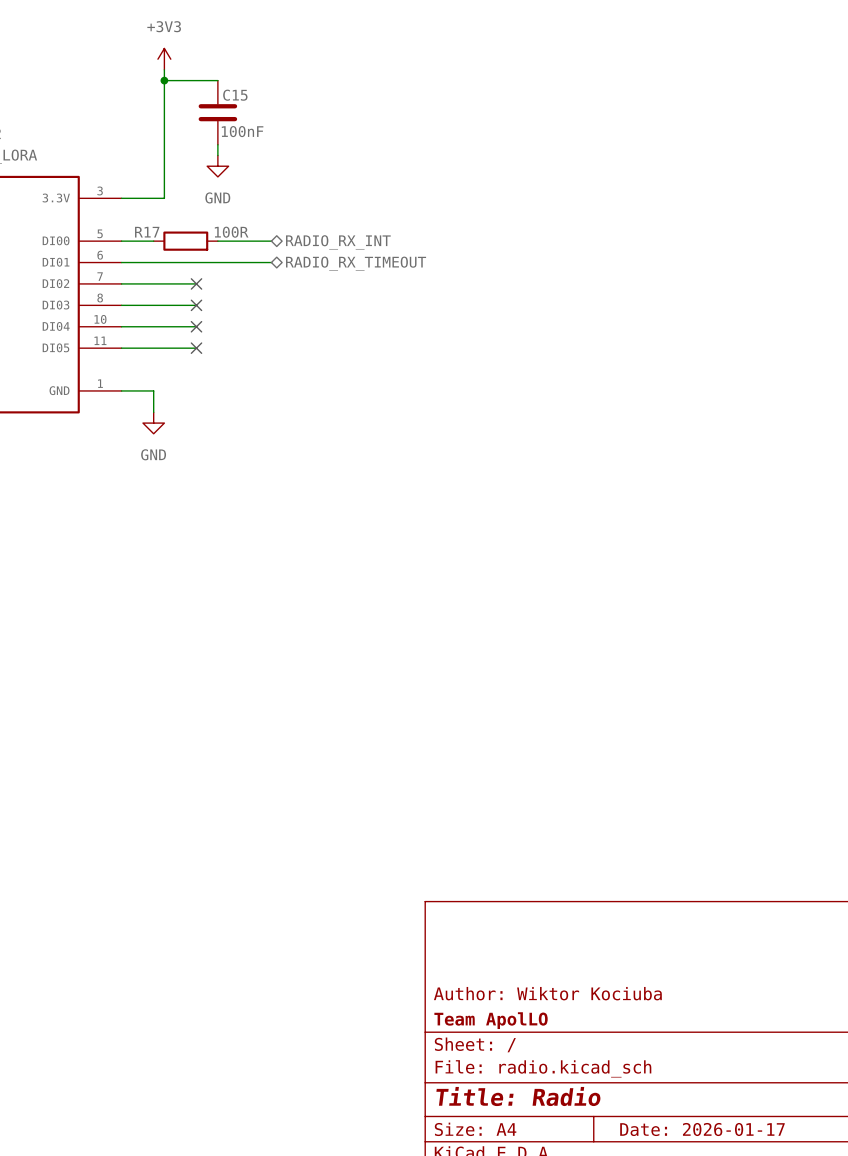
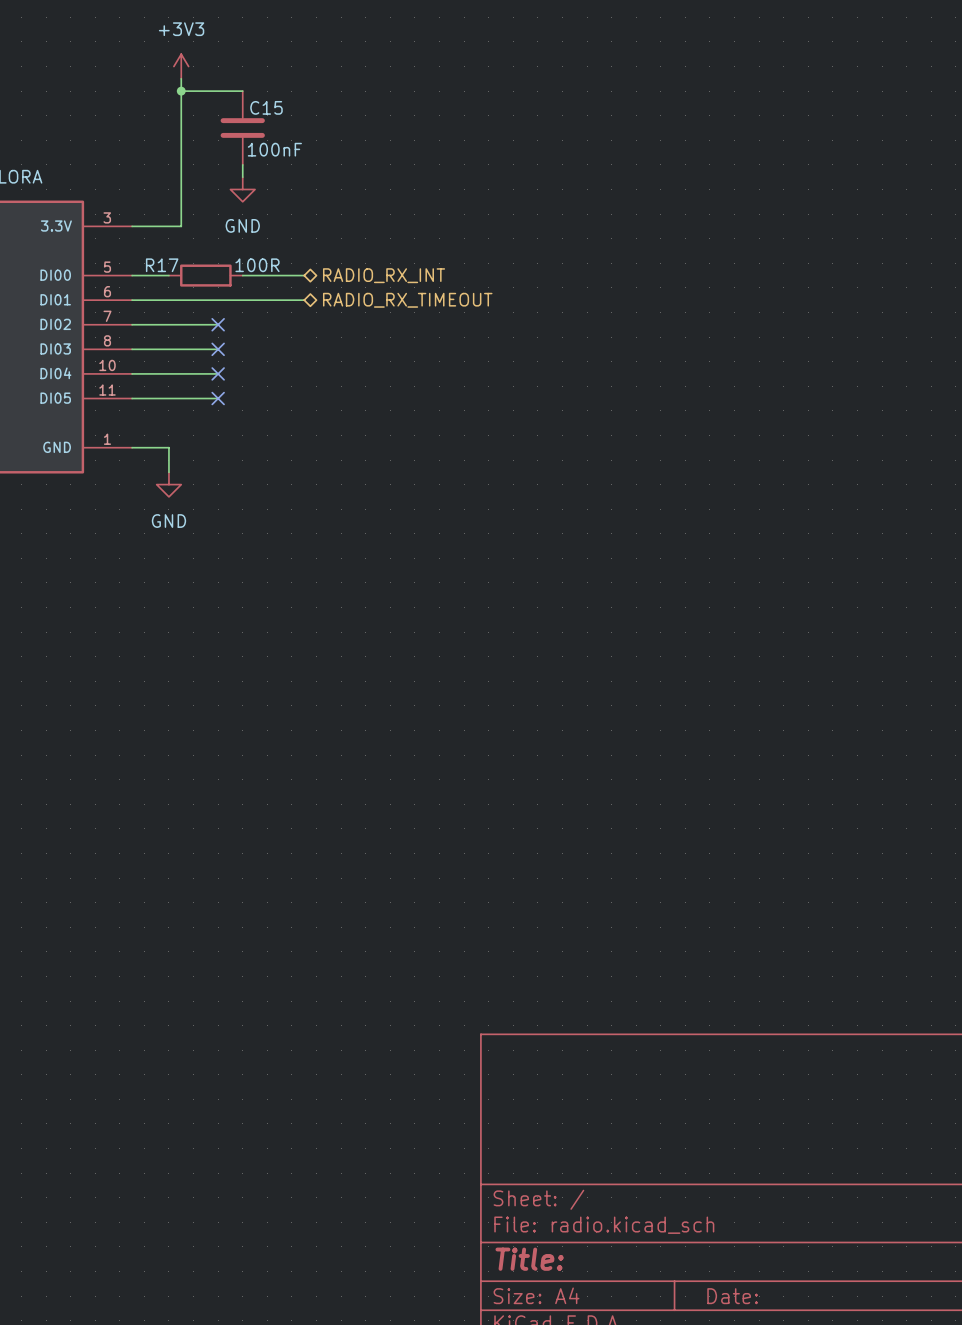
title block: Author: Wiktor Kociuba (547, 993) -> none
title block: Team ApolLO (491, 1020) -> none
title block: Title: Radio (518, 1096) -> Title: (529, 1259)
title block: Date: 2026-01-17 (702, 1129) -> Date: (732, 1296)

